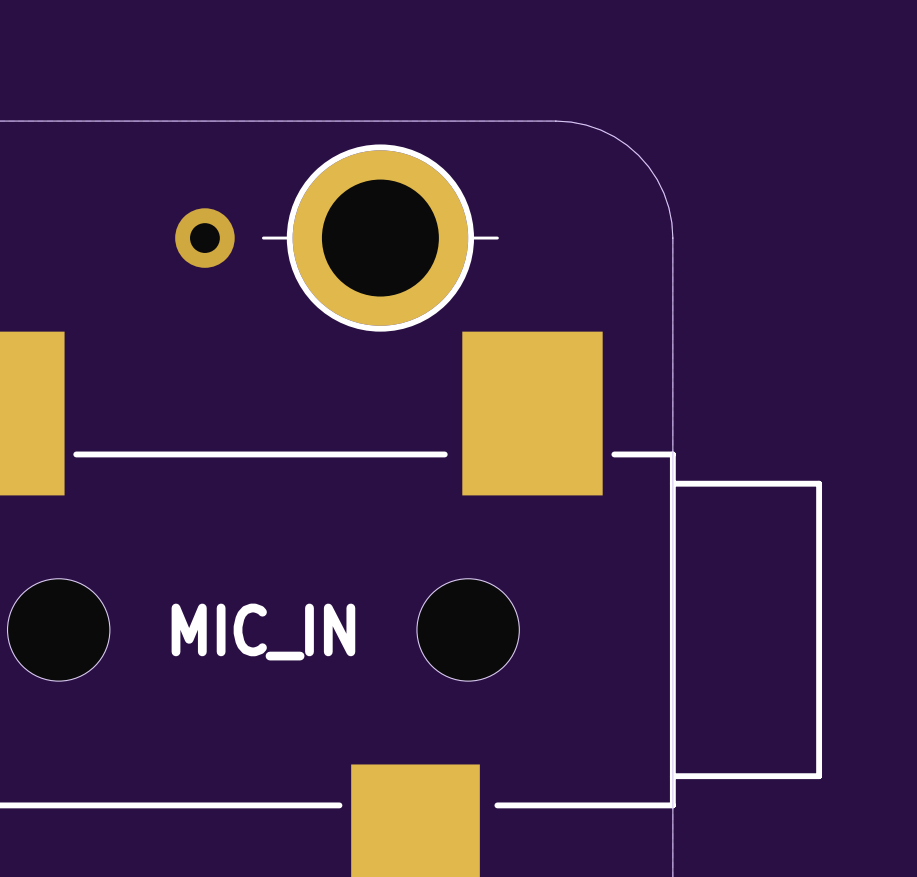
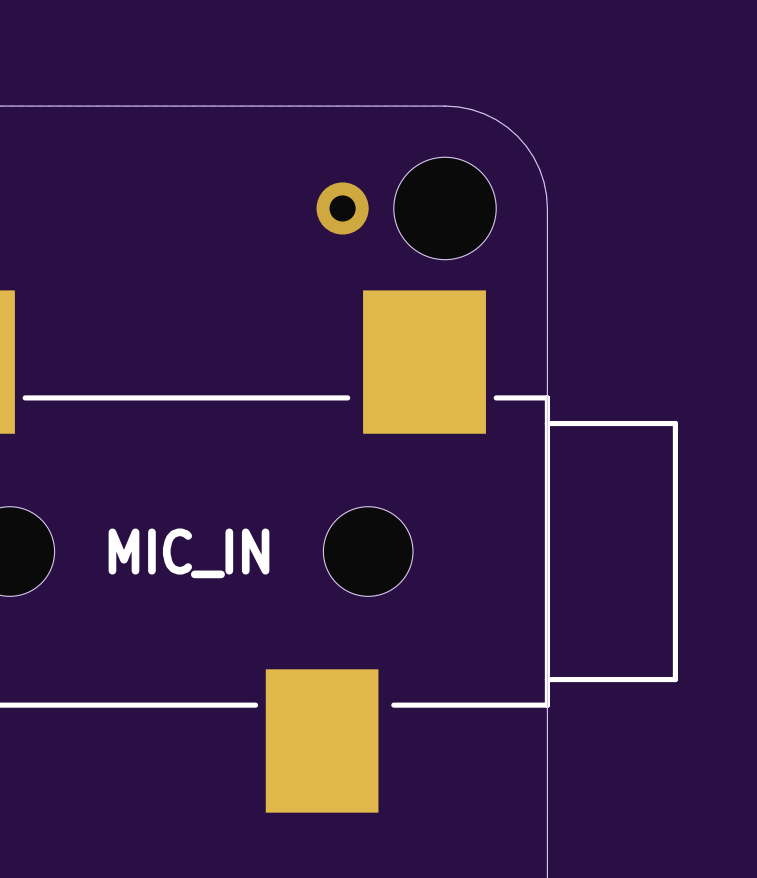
via position: (204, 238) -> (342, 208)
part: (380, 238) -> none
hole: none -> (445, 208)

